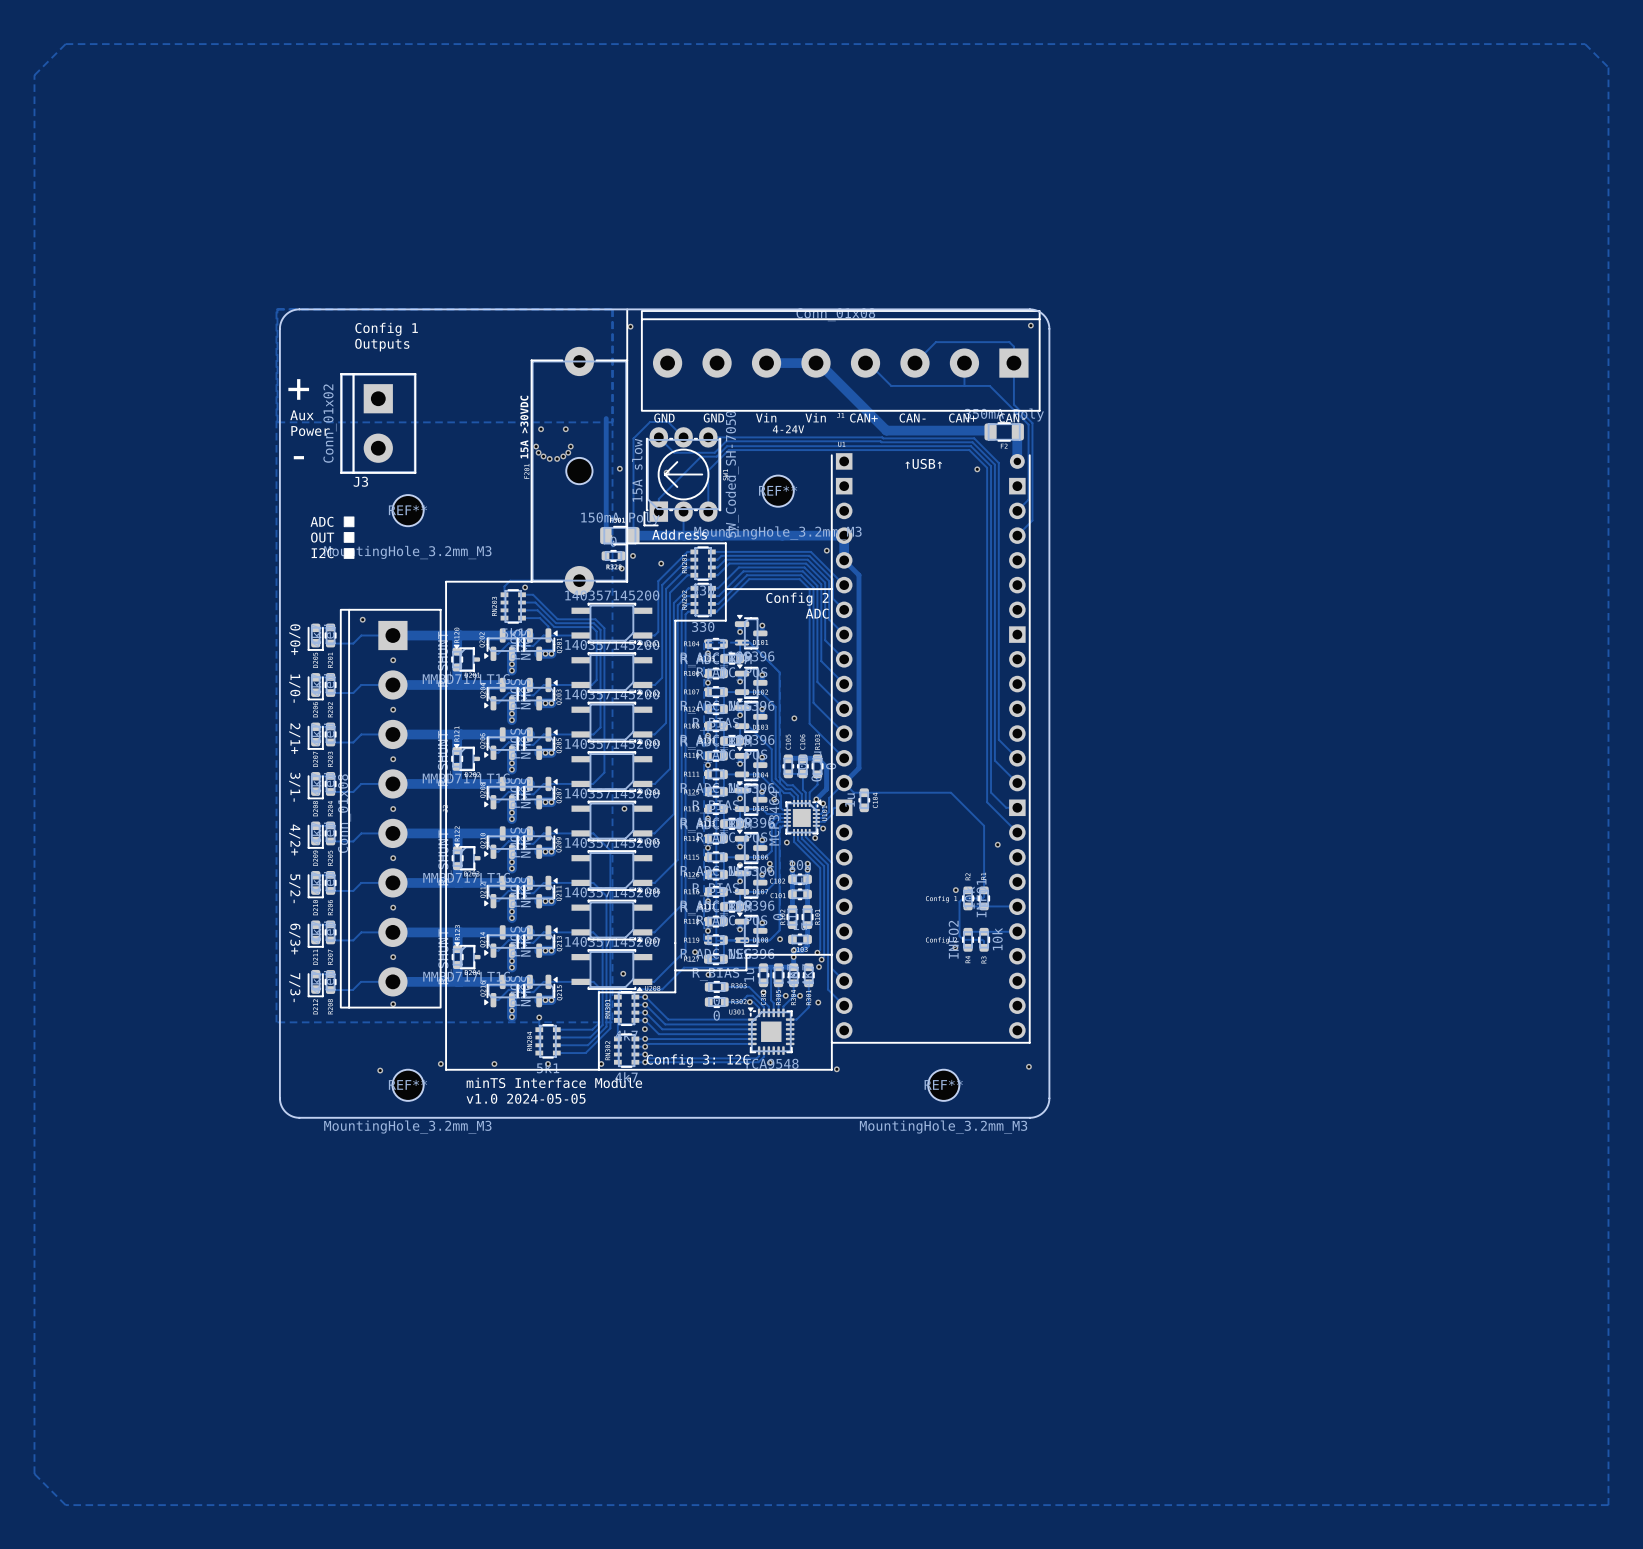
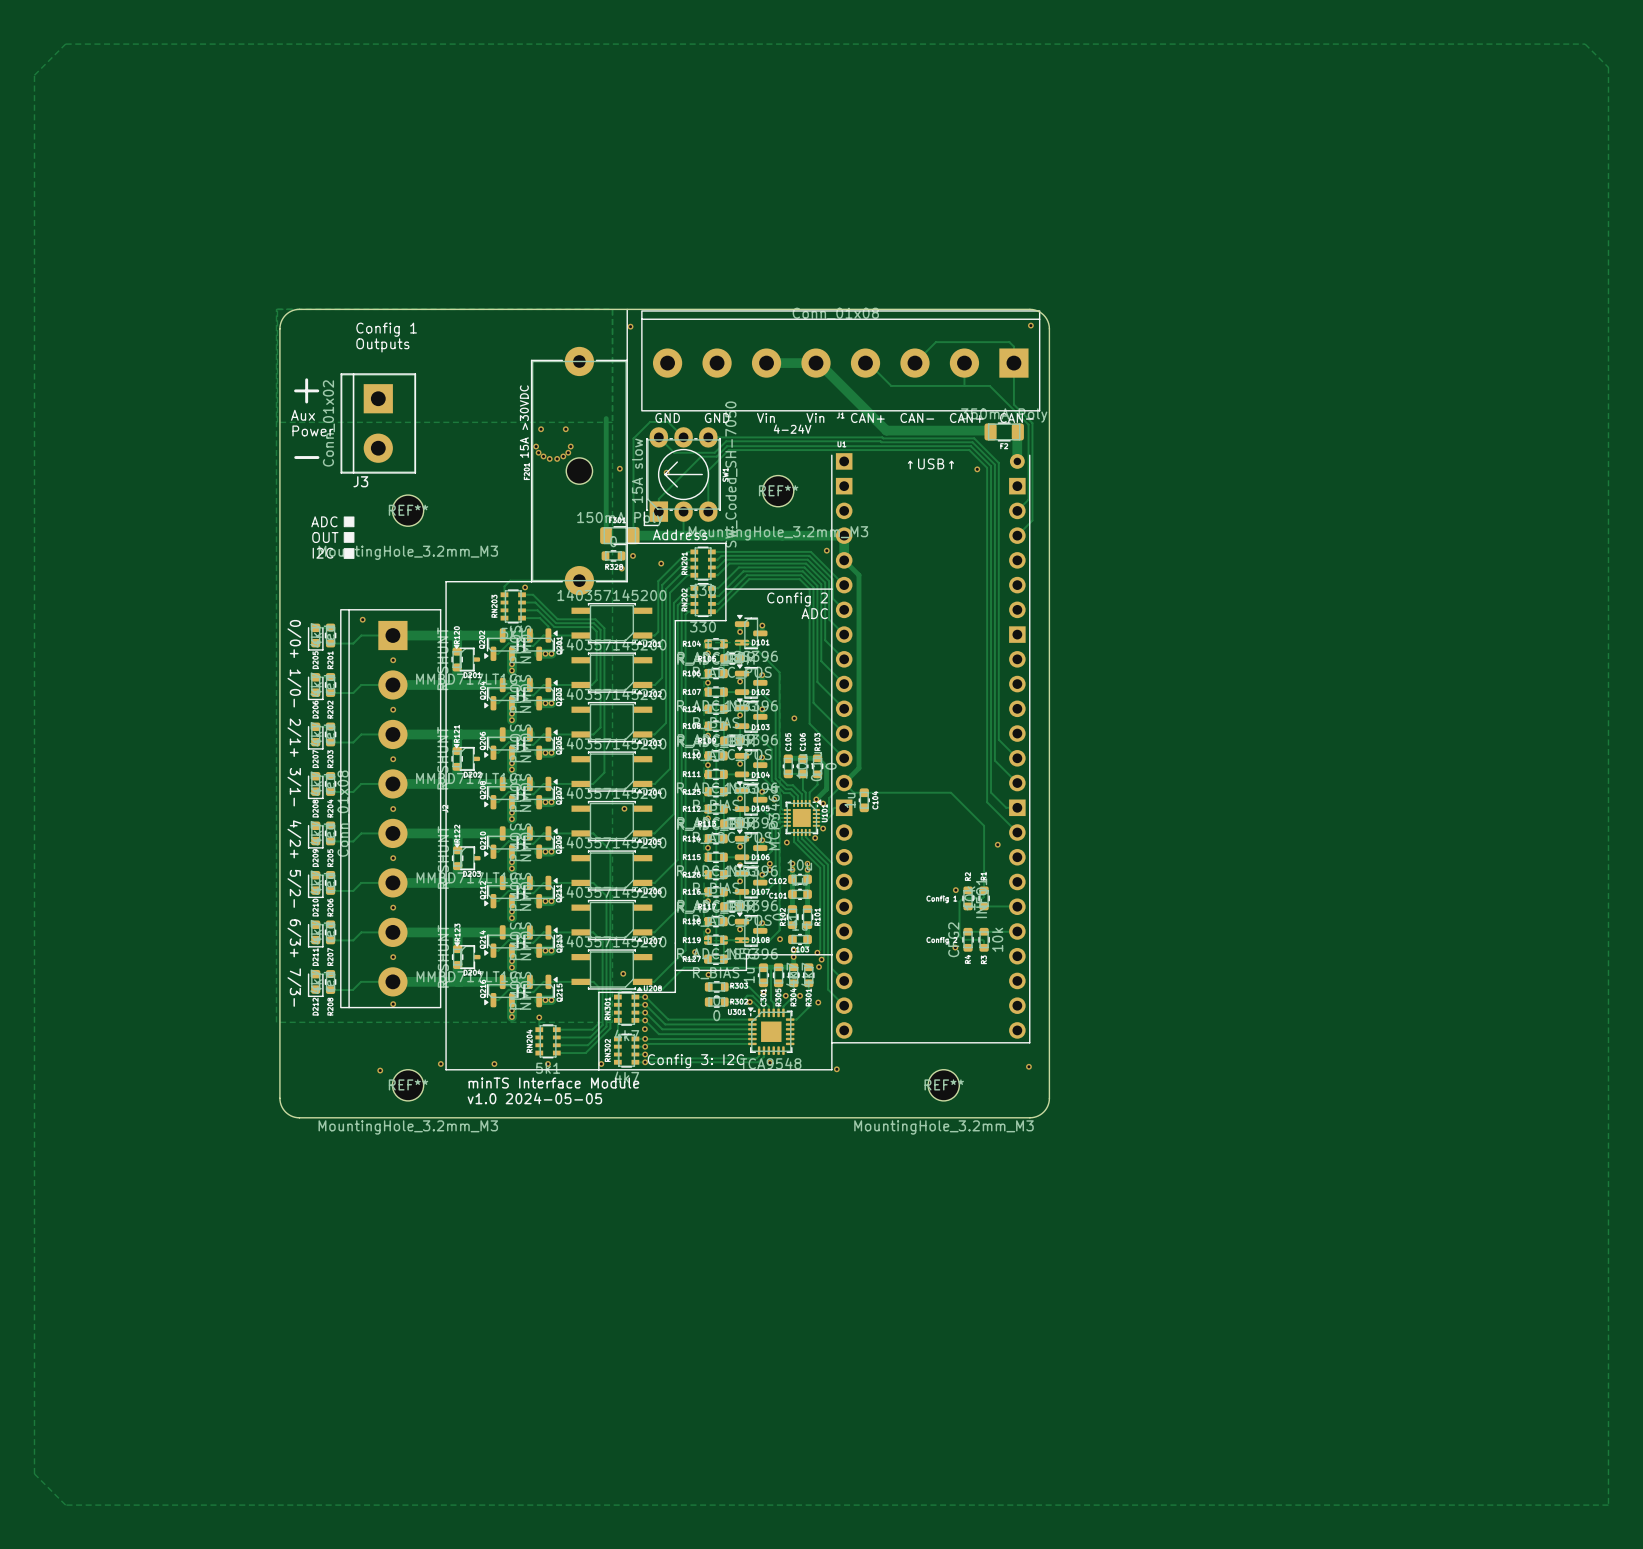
part value: INFO2 (953, 939) -> CFG2 (953, 939)

